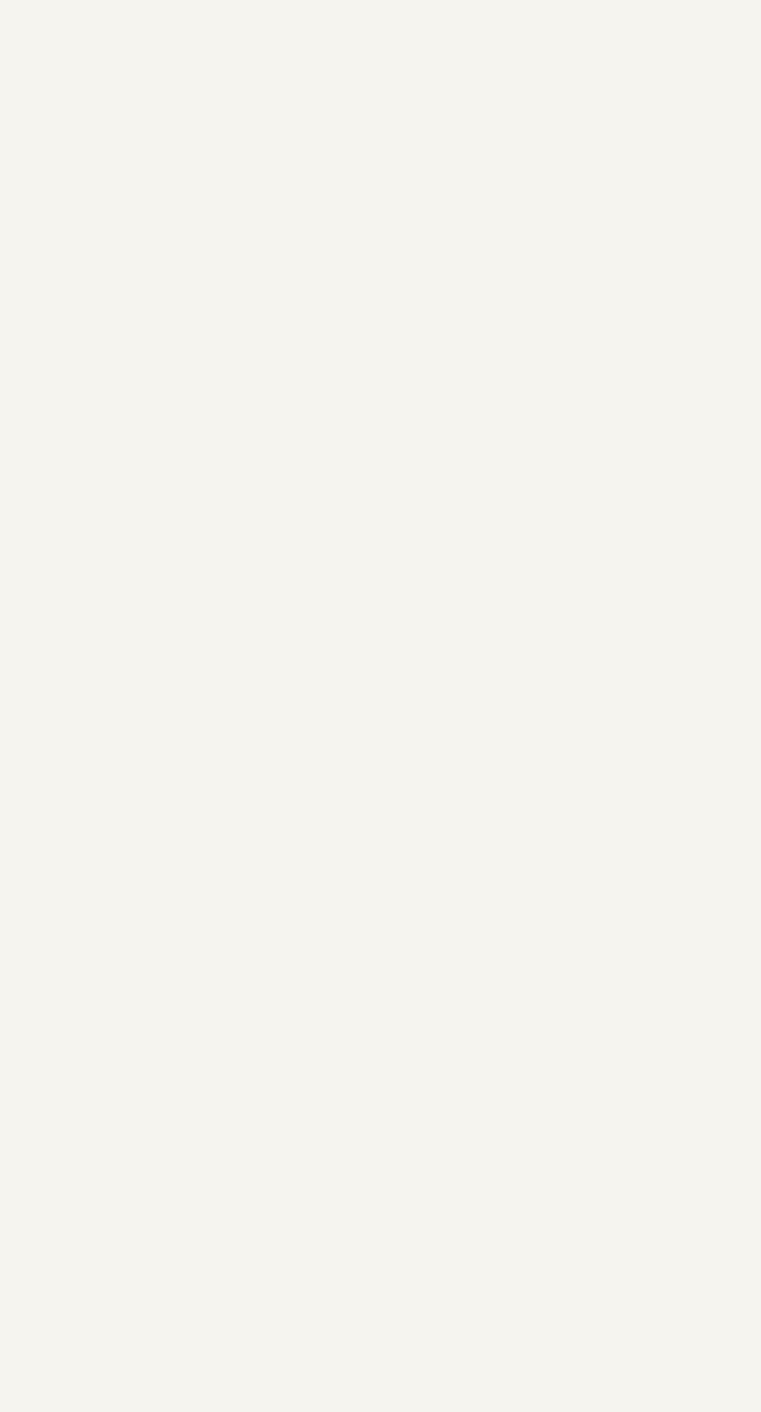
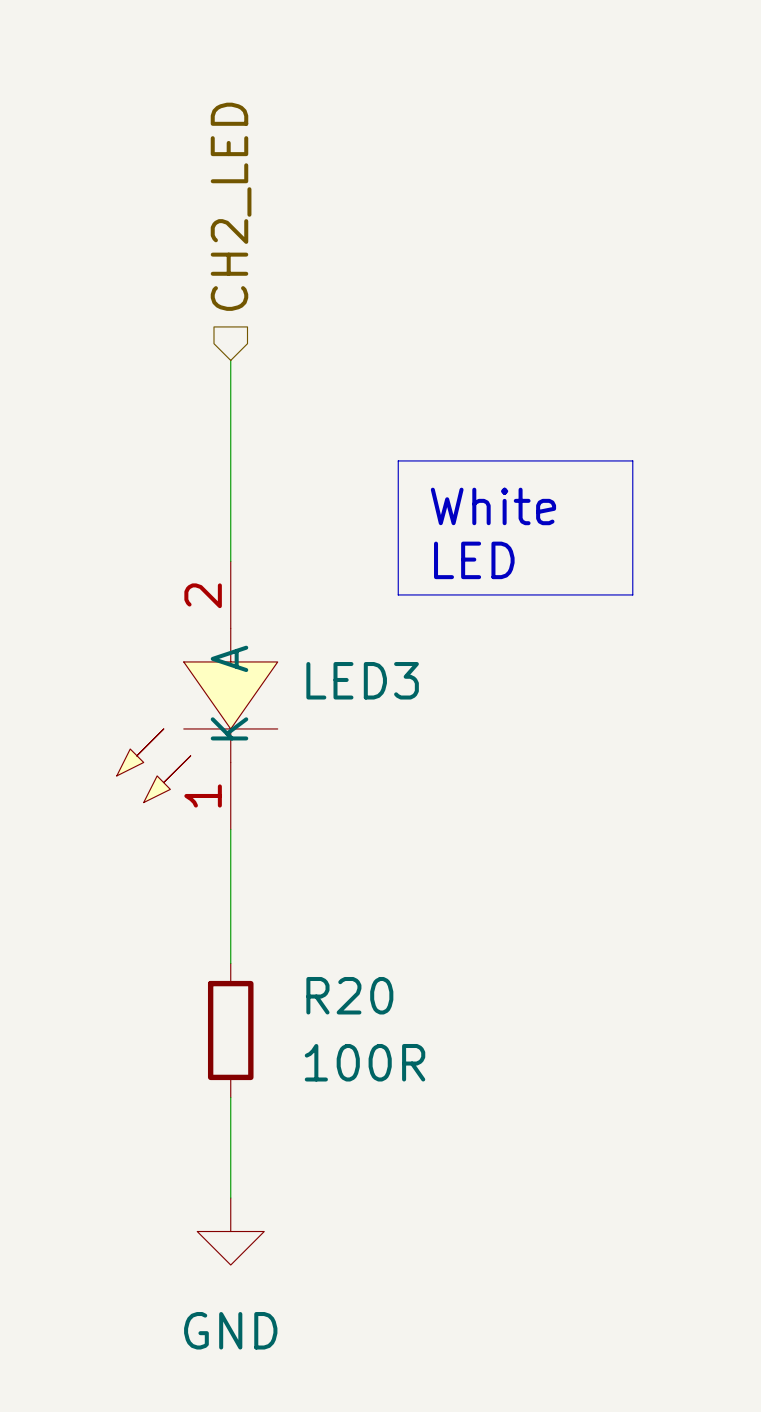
hierarchical label: none -> CH2_LED (231, 206)
wire: none -> (230, 360) (230, 561)
line: none -> (398, 460) (632, 460) (632, 594) (398, 594) (398, 460)
text: none -> White (493, 506)
text: none -> LED (474, 560)
LED3: none -> (197, 695)
wire: none -> (230, 829) (230, 963)
R20: none -> 100R (230, 1030)
wire: none -> (230, 1097) (230, 1198)
power symbol: none -> GND (230, 1231)

